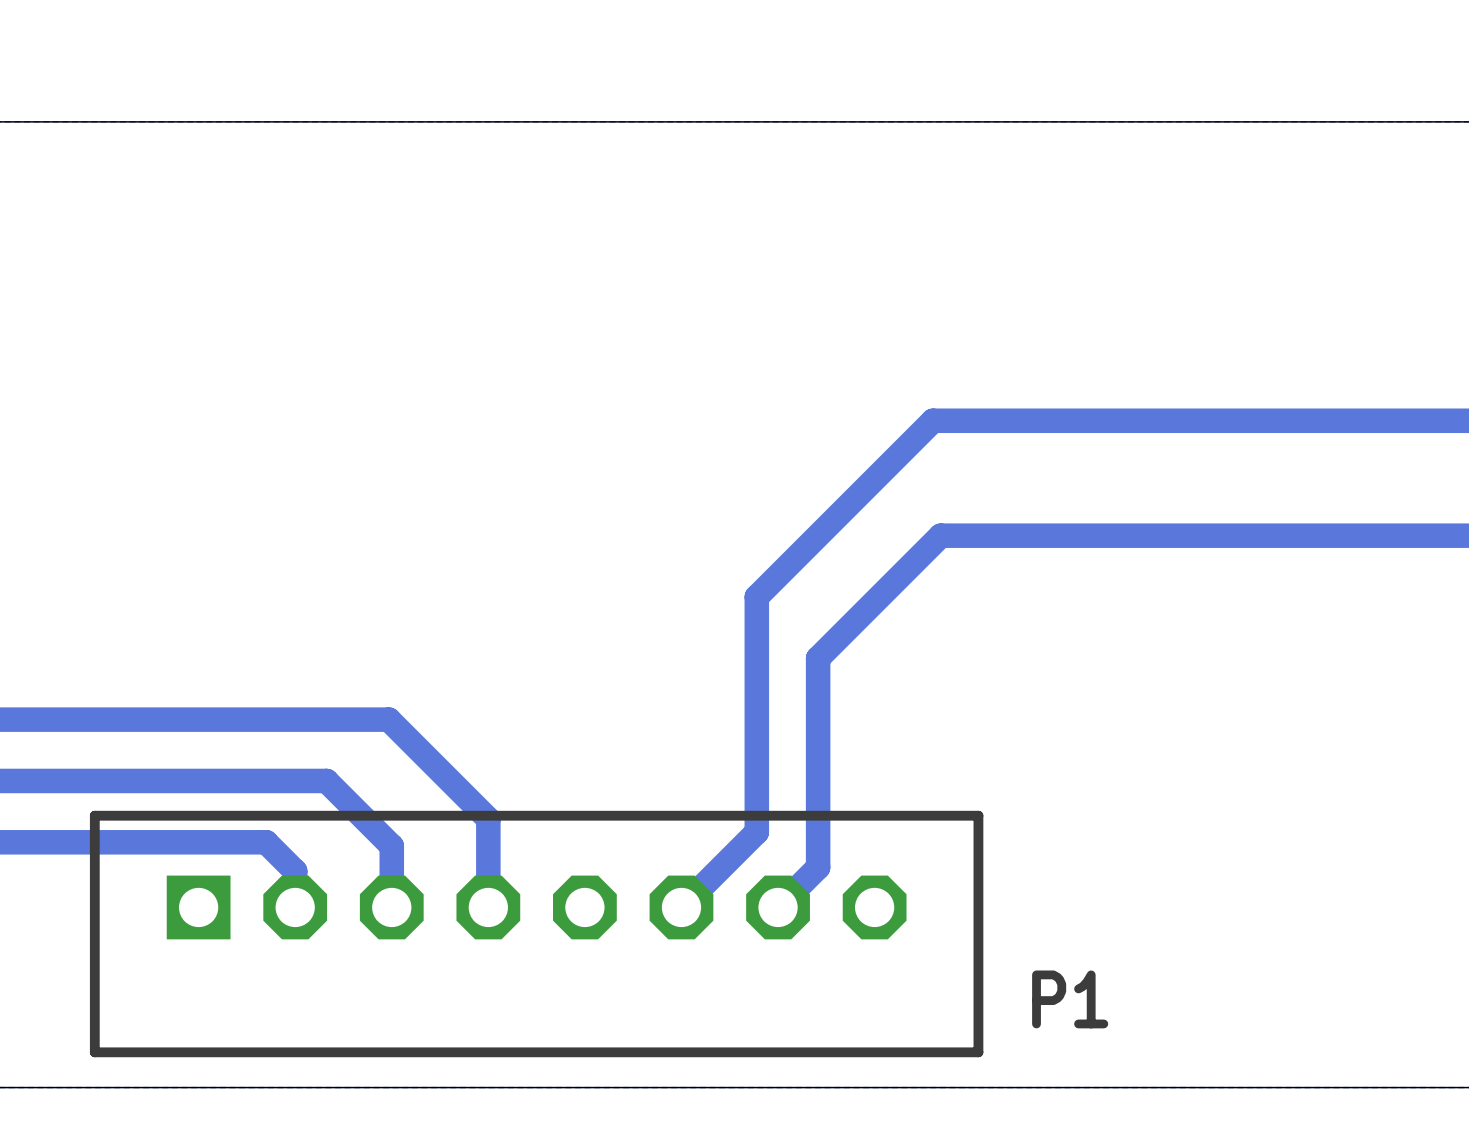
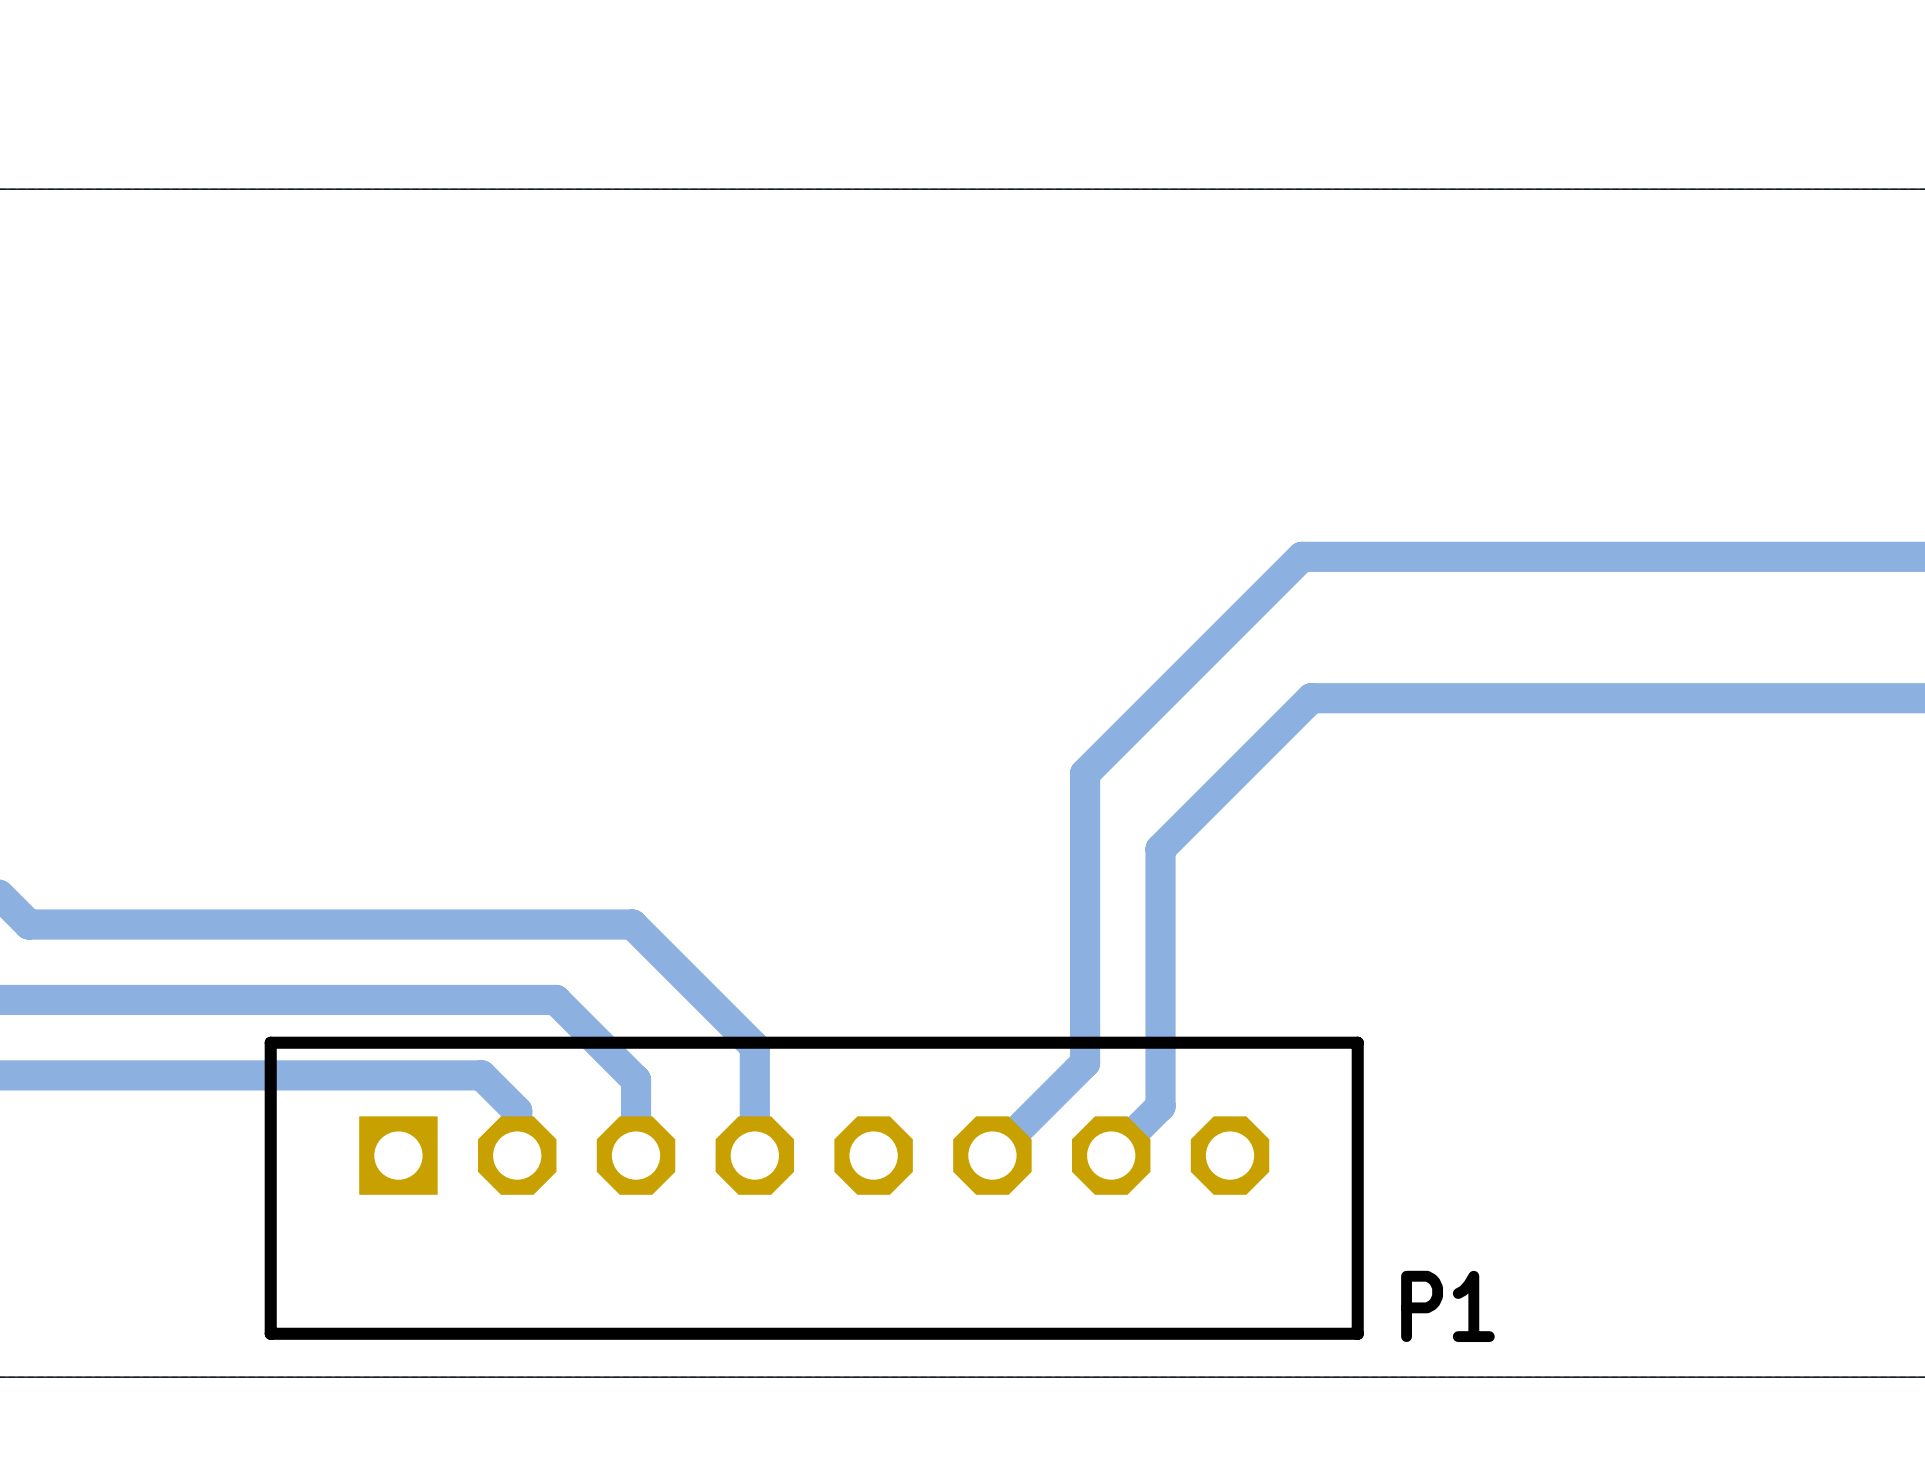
P1 name position: P1 (1070, 999) -> P1 (1447, 1306)

